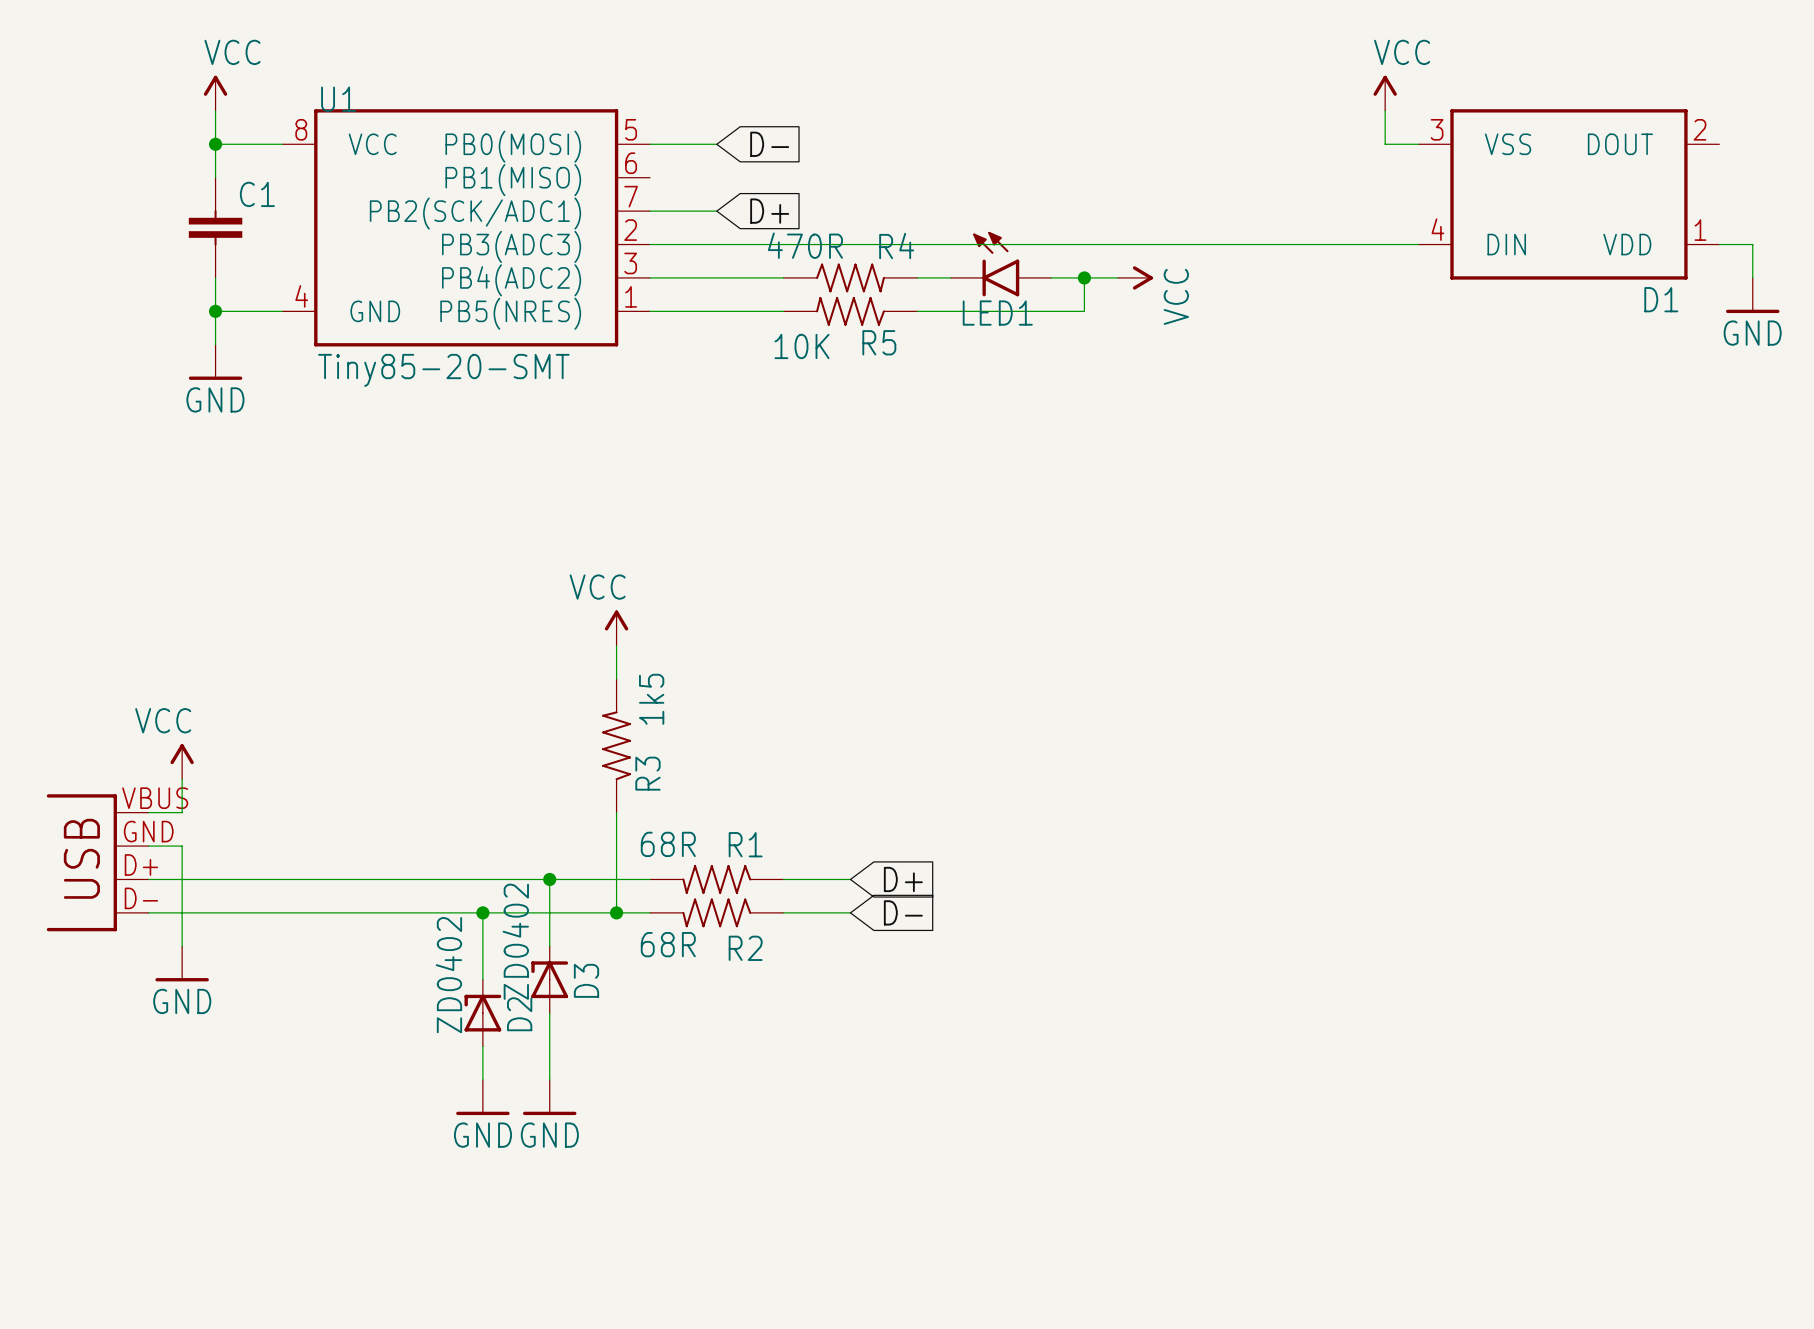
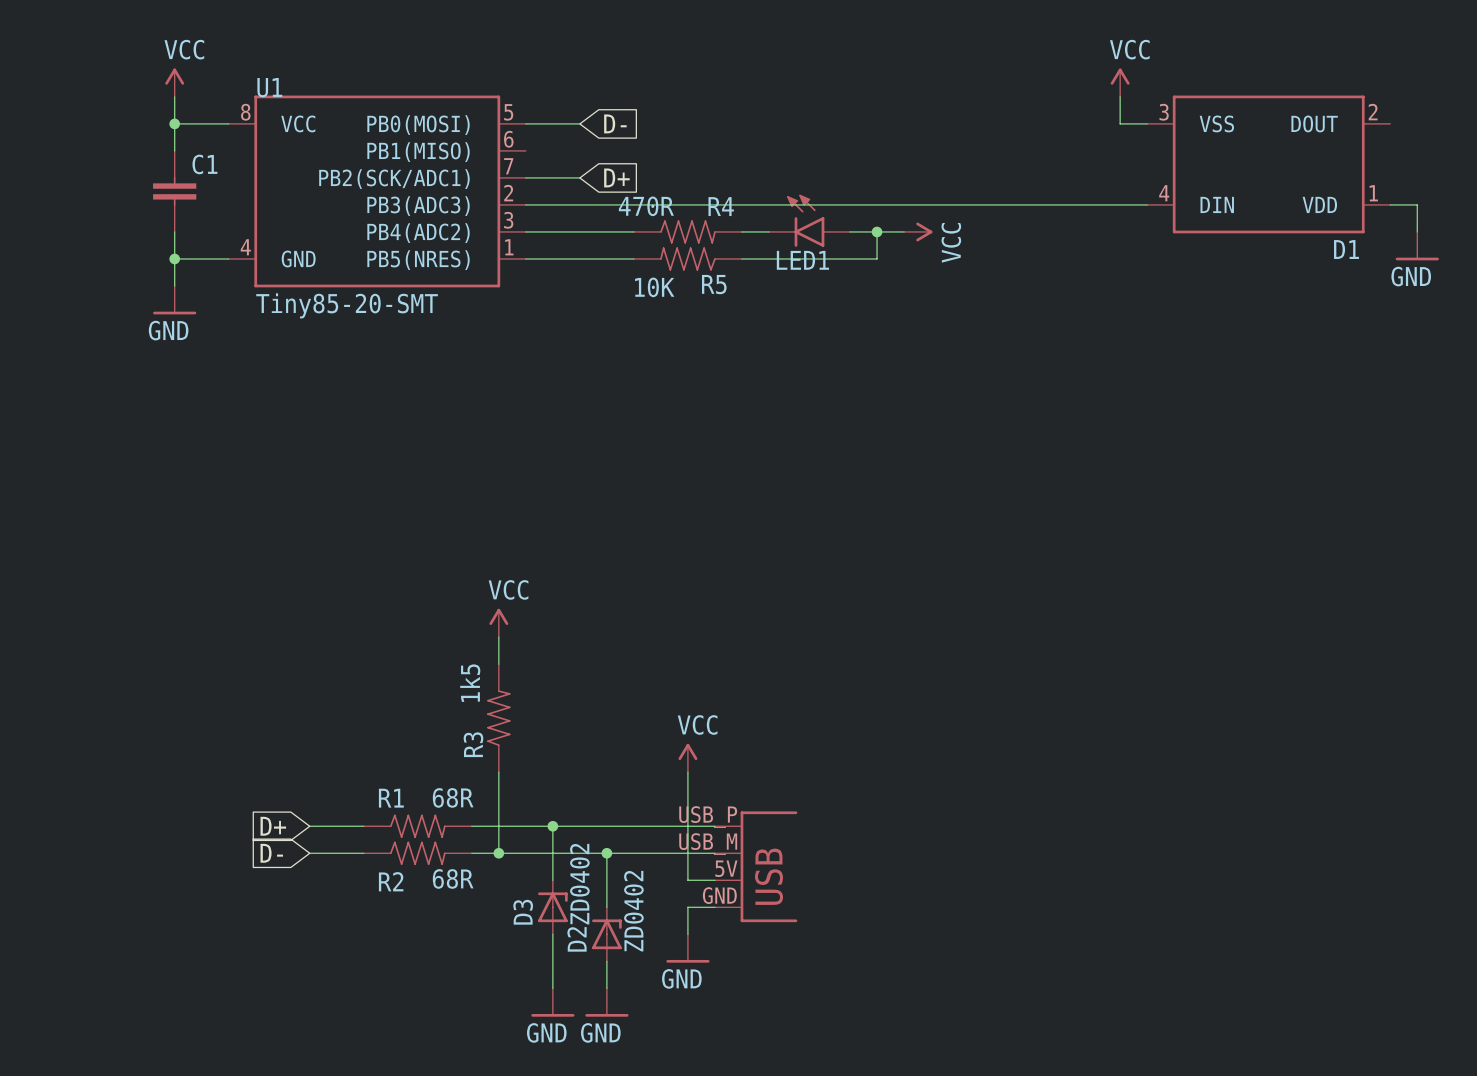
power symbol text position: VCC (597, 587) -> VCC (508, 589)
power symbol position: VCC (616, 628) -> VCC (498, 622)
wire: (616, 645) (616, 678) -> none
R3 flip: as is (616, 745) -> left-right (498, 718)
R3 position: (616, 745) -> (498, 718)
power symbol: VCC (182, 761) -> none
wire: (182, 779) (182, 812) (148, 812) -> none
wire: (148, 846) (182, 846) (182, 946) -> none
part: (97, 862) -> none
wire: (148, 879) (649, 879) -> none
wire: (549, 879) (549, 946) -> (552, 826) (552, 880)
junction: (549, 879) -> none
R1 flip: as is (716, 879) -> left-right (417, 826)
R1 position: (716, 879) -> (417, 826)
wire: (783, 879) (850, 879) -> none
global label: D+ (903, 879) -> none
wire: (148, 912) (649, 912) -> none
wire: (482, 912) (482, 979) -> (606, 853) (606, 907)
junction: (482, 912) -> none
junction: (616, 912) -> none
R2 flip: as is (716, 912) -> left-right (417, 853)
R2 position: (716, 912) -> (417, 853)
wire: (783, 912) (850, 912) -> none
global label: D- (903, 912) -> none
power symbol: none -> VCC (687, 758)
wire: none -> (498, 772) (498, 853)
wire: none -> (687, 772) (687, 880) (714, 880)
power symbol: GND (182, 963) -> none
D3 flip: as is (549, 979) -> left-right (552, 907)
D3 position: (549, 979) -> (552, 907)
global label: none -> D+ (273, 826)
wire: none -> (309, 826) (363, 826)
D2 flip: as is (482, 1013) -> left-right (606, 934)
D2 position: (482, 1013) -> (606, 934)
wire: (549, 1013) (549, 1079) -> (552, 934) (552, 988)
wire: none -> (471, 826) (714, 826)
junction: none -> (552, 826)
global label: none -> D- (271, 853)
wire: none -> (309, 853) (363, 853)
wire: (482, 1046) (482, 1079) -> (606, 961) (606, 988)
wire: none -> (471, 853) (714, 853)
junction: none -> (498, 853)
junction: none -> (606, 853)
part: none -> (756, 866)
power symbol: GND (482, 1097) -> none
power symbol: GND (549, 1097) -> none
wire: none -> (714, 907) (687, 907) (687, 934)
power symbol: none -> GND (687, 948)
power symbol: none -> GND (552, 1002)
power symbol: none -> GND (606, 1002)

